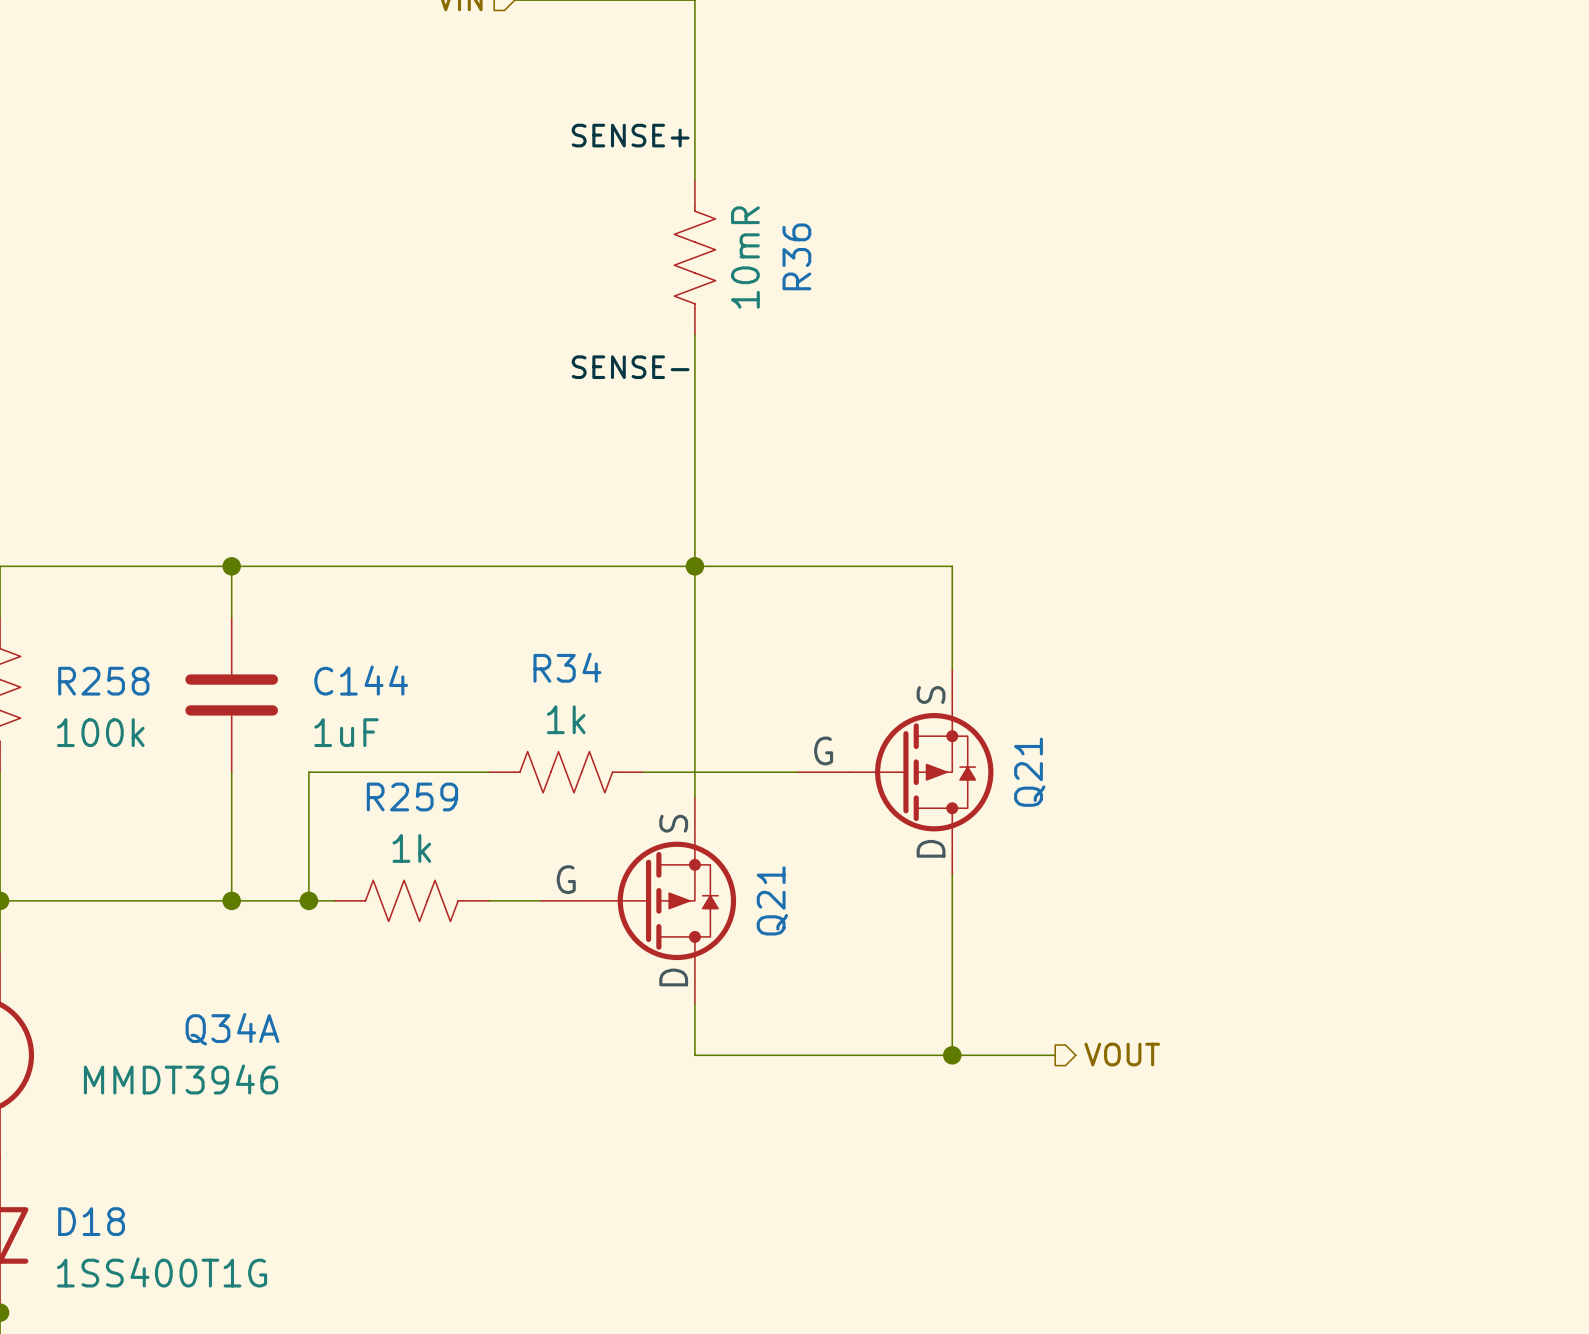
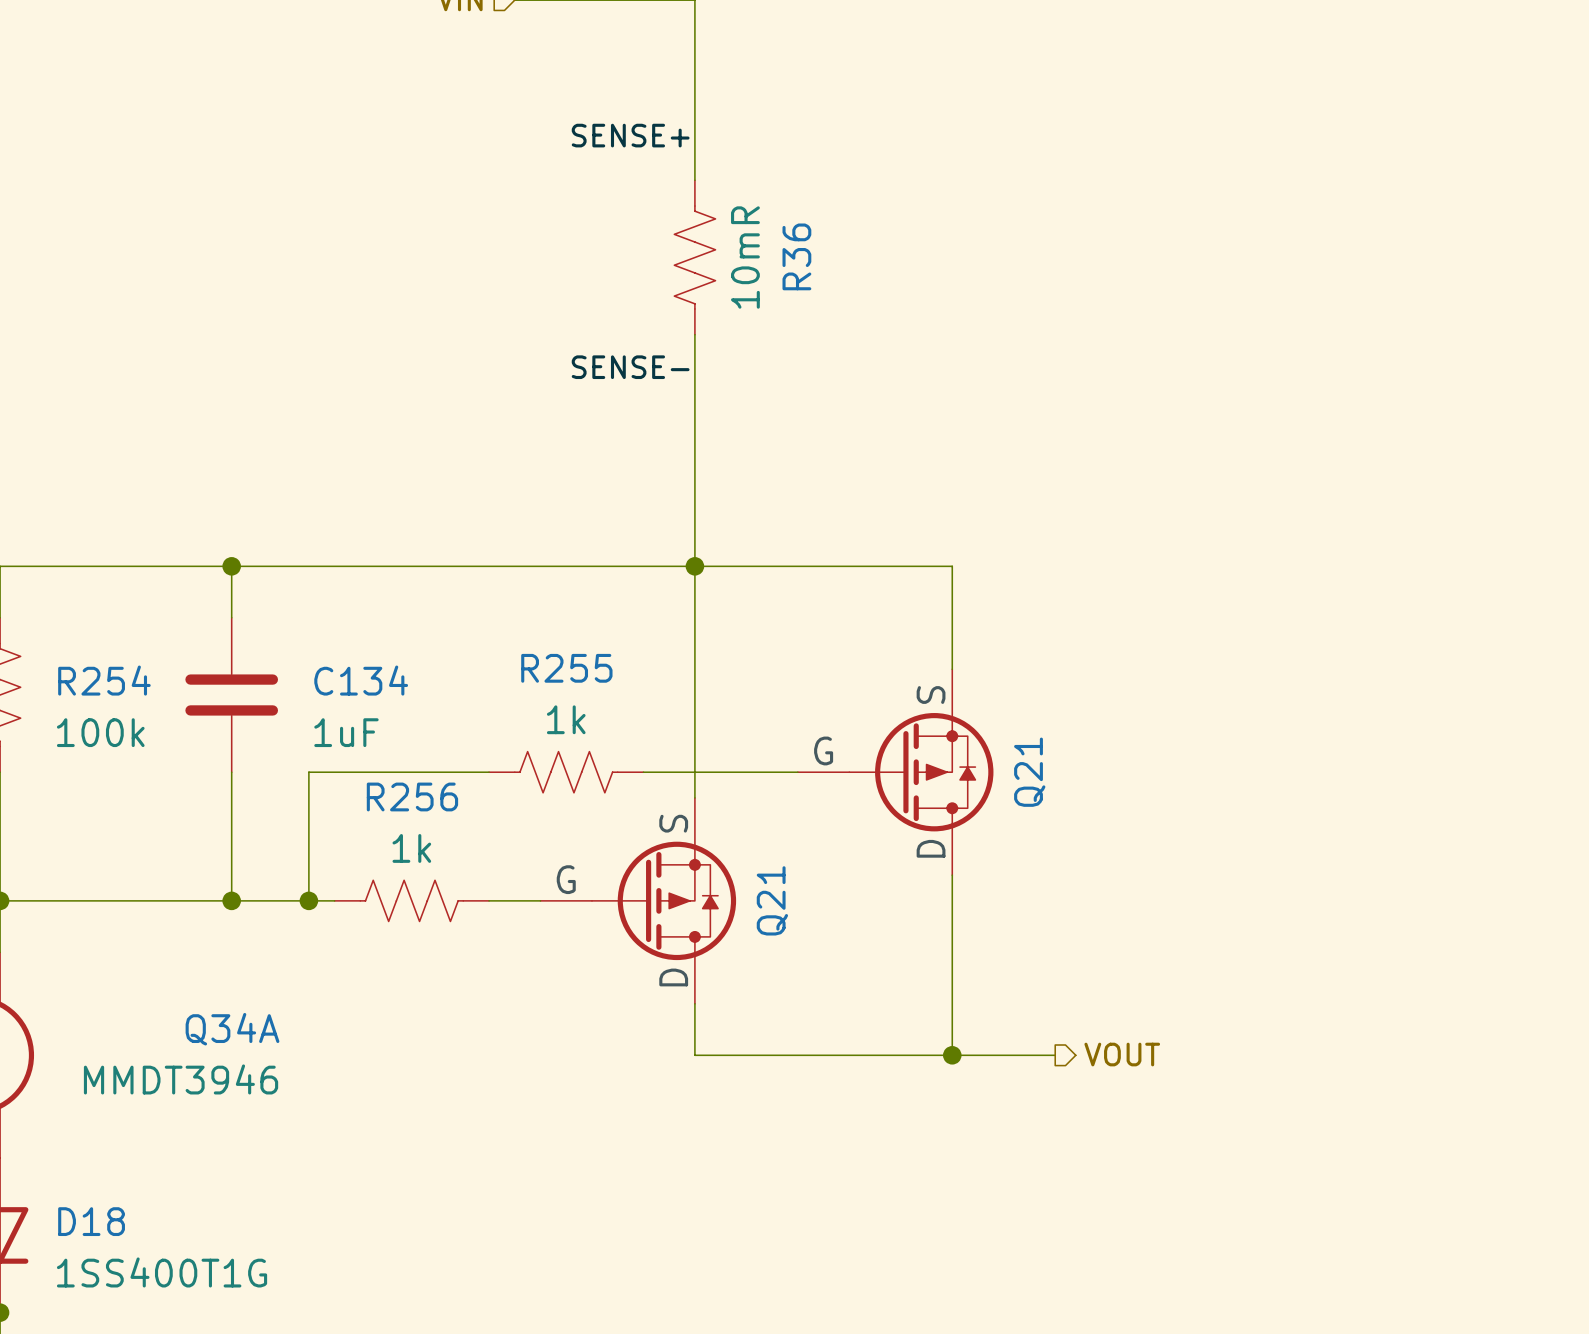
R34 name: R34 (567, 667) -> R255 (566, 668)
C144 name: C144 (361, 680) -> C134 (361, 680)
R258 name: R258 (103, 681) -> R254 (104, 680)
R259 name: R259 (412, 796) -> R256 (412, 796)

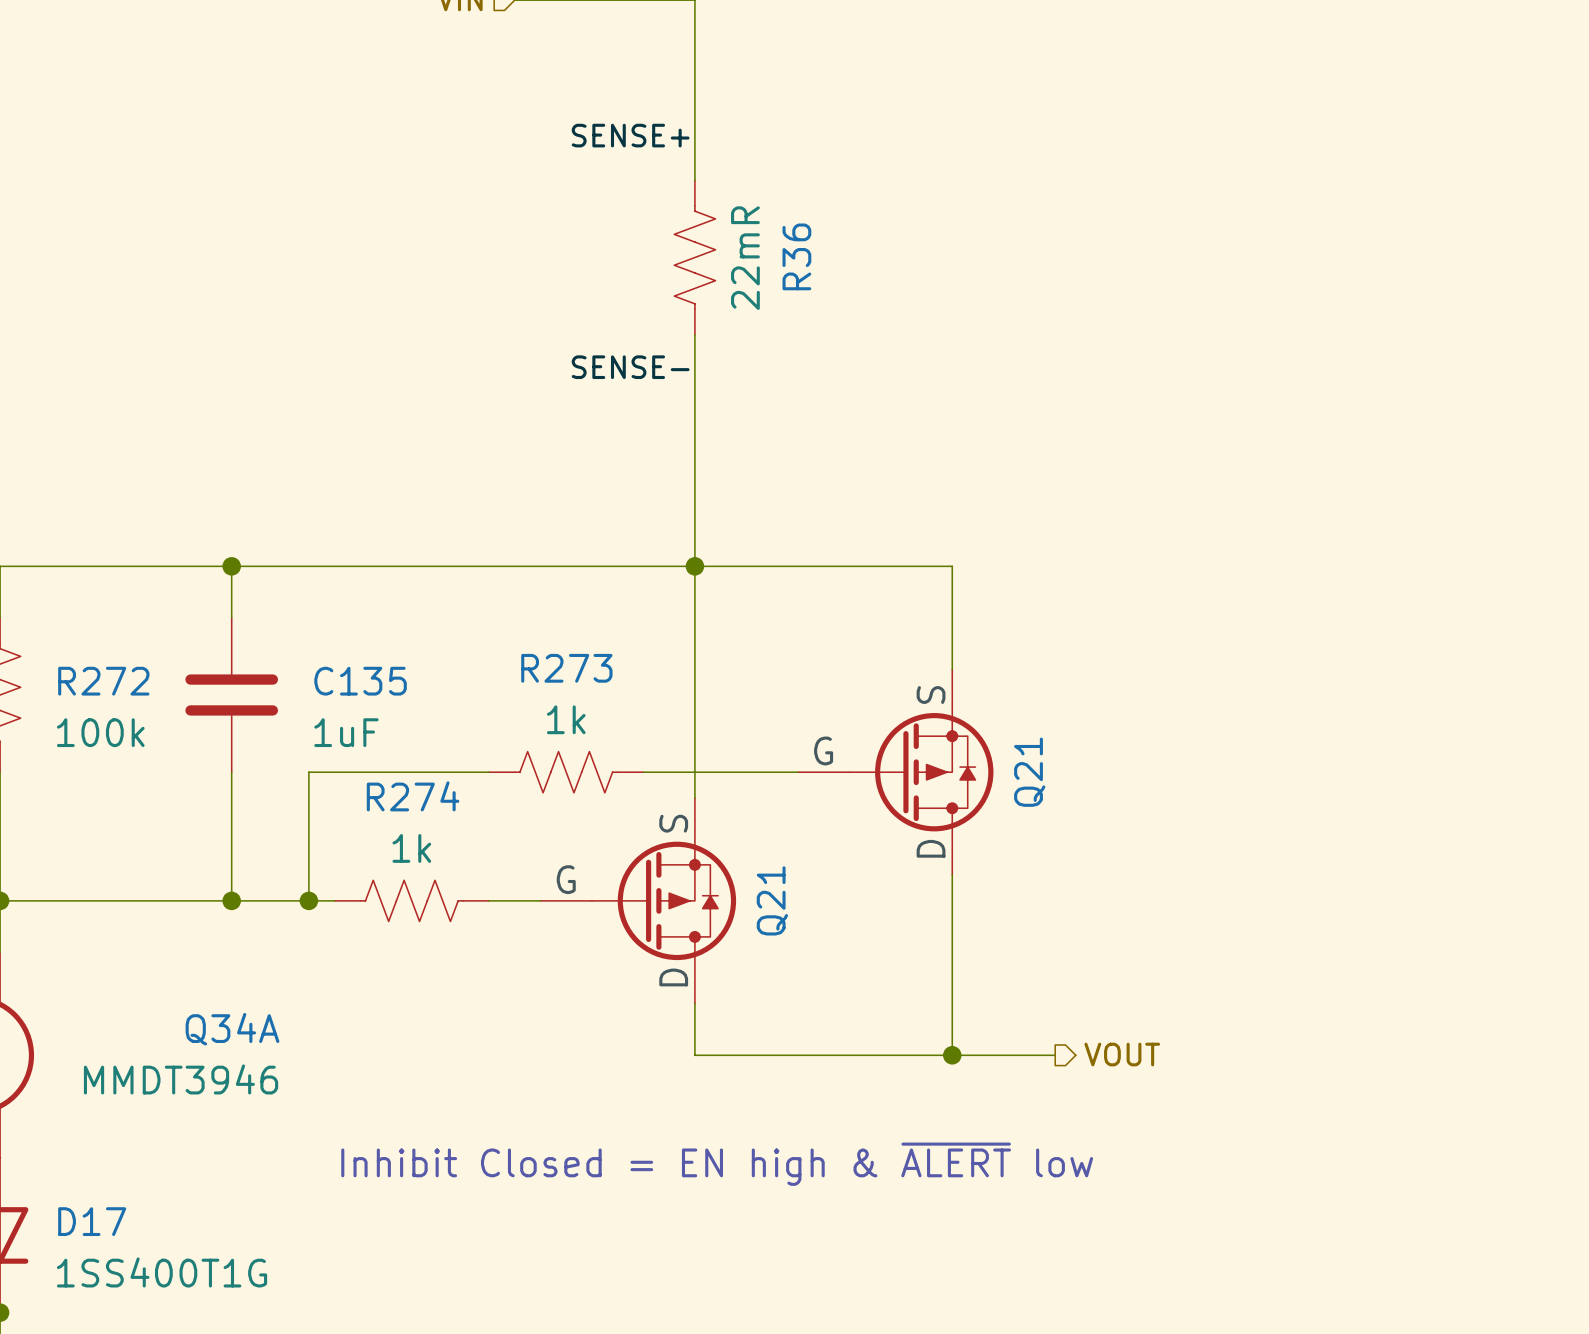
R36 value: 10mR (745, 257) -> 22mR (745, 258)
R255 name: R255 (566, 668) -> R273 (566, 668)
R254 name: R254 (104, 680) -> R272 (103, 681)
C134 name: C134 (361, 680) -> C135 (360, 681)
R256 name: R256 (412, 796) -> R274 (413, 796)
text: none -> Inhibit Closed = EN high & ~{ALERT} low (717, 1164)
D18 name: D18 (91, 1221) -> D17 (92, 1221)

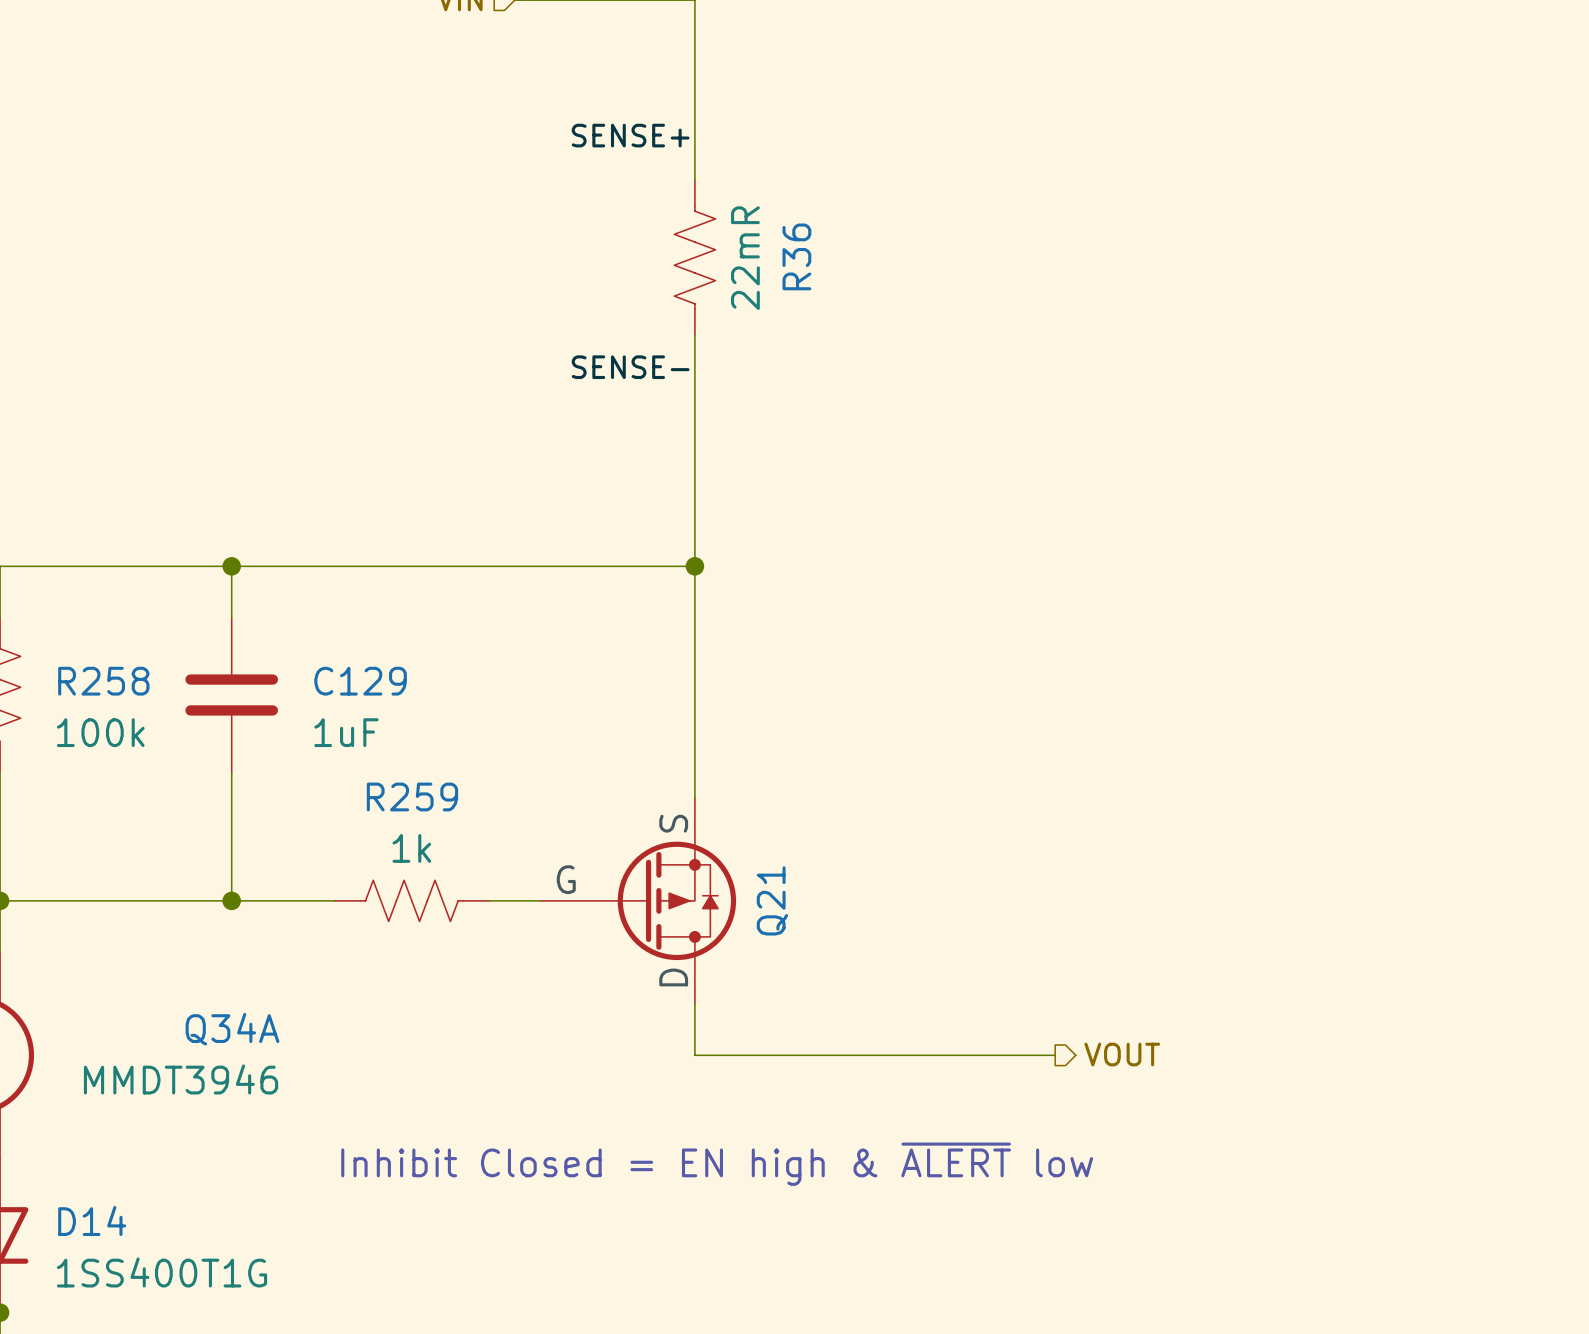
wire: (694, 566) (952, 566) (952, 669) -> none
R272 name: R272 (103, 681) -> R258 (103, 681)
C135 name: C135 (360, 681) -> C129 (360, 681)
wire: (489, 772) (308, 772) (308, 900) -> none
R273: 1k (566, 772) -> none
wire: (643, 772) (797, 772) -> none
Q21: (895, 772) -> none
R274 name: R274 (413, 796) -> R259 (412, 796)
wire: (952, 875) (952, 1055) -> none
junction: (308, 900) -> none
junction: (952, 1055) -> none
D17 name: D17 (92, 1221) -> D14 (92, 1221)

